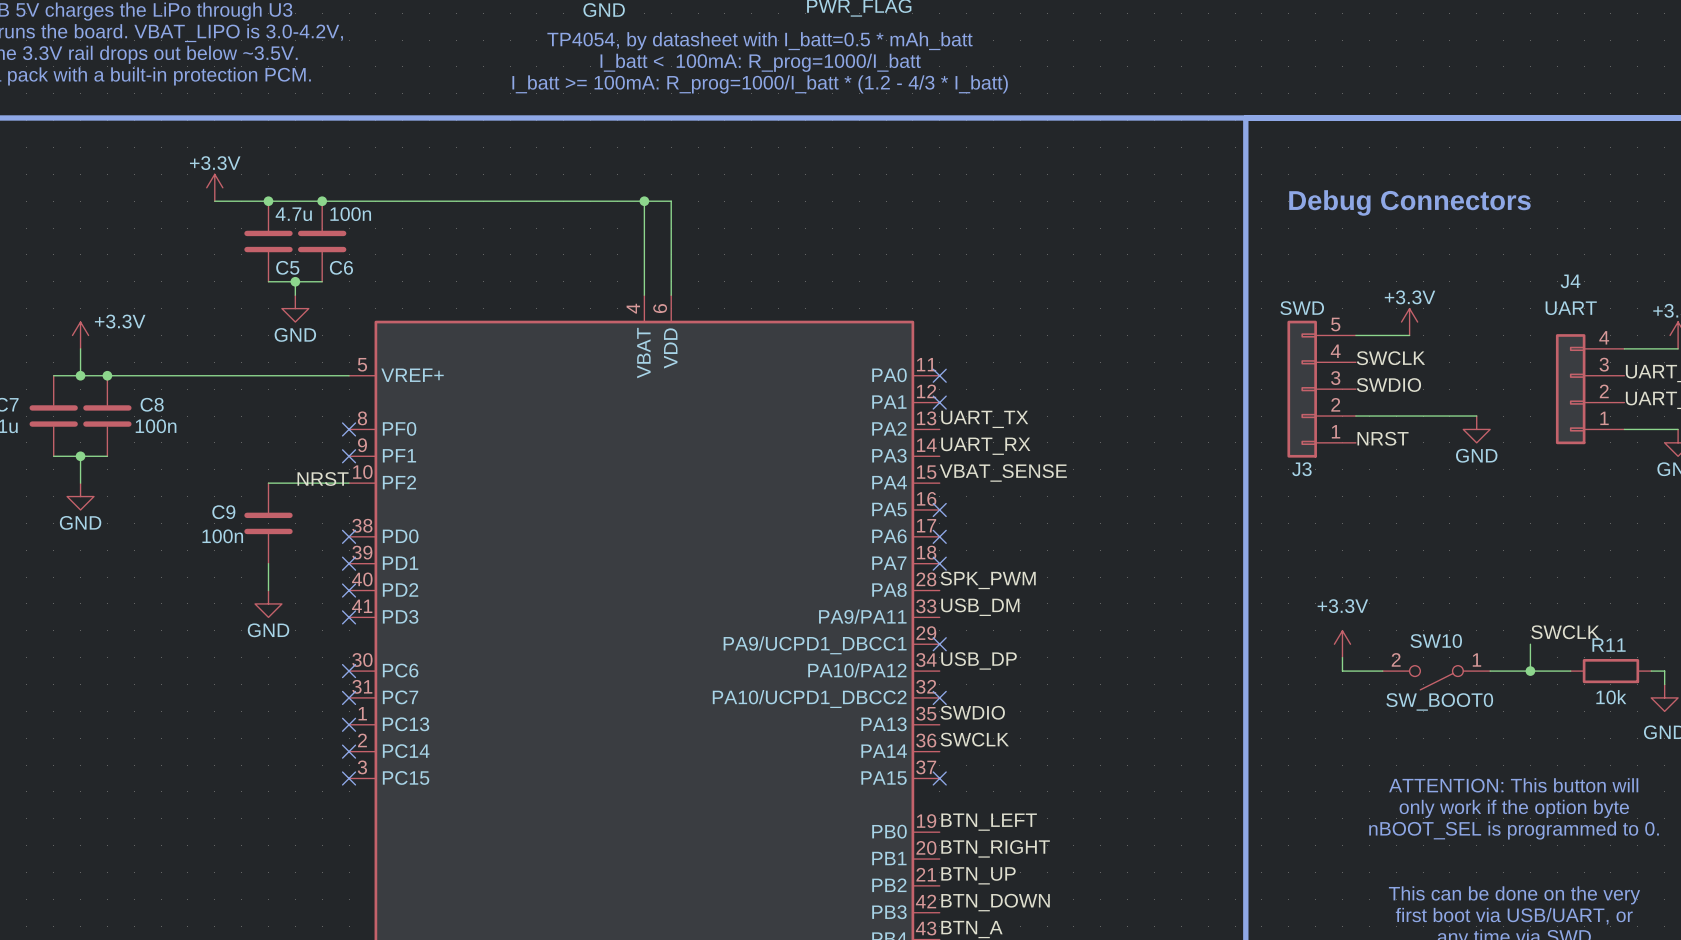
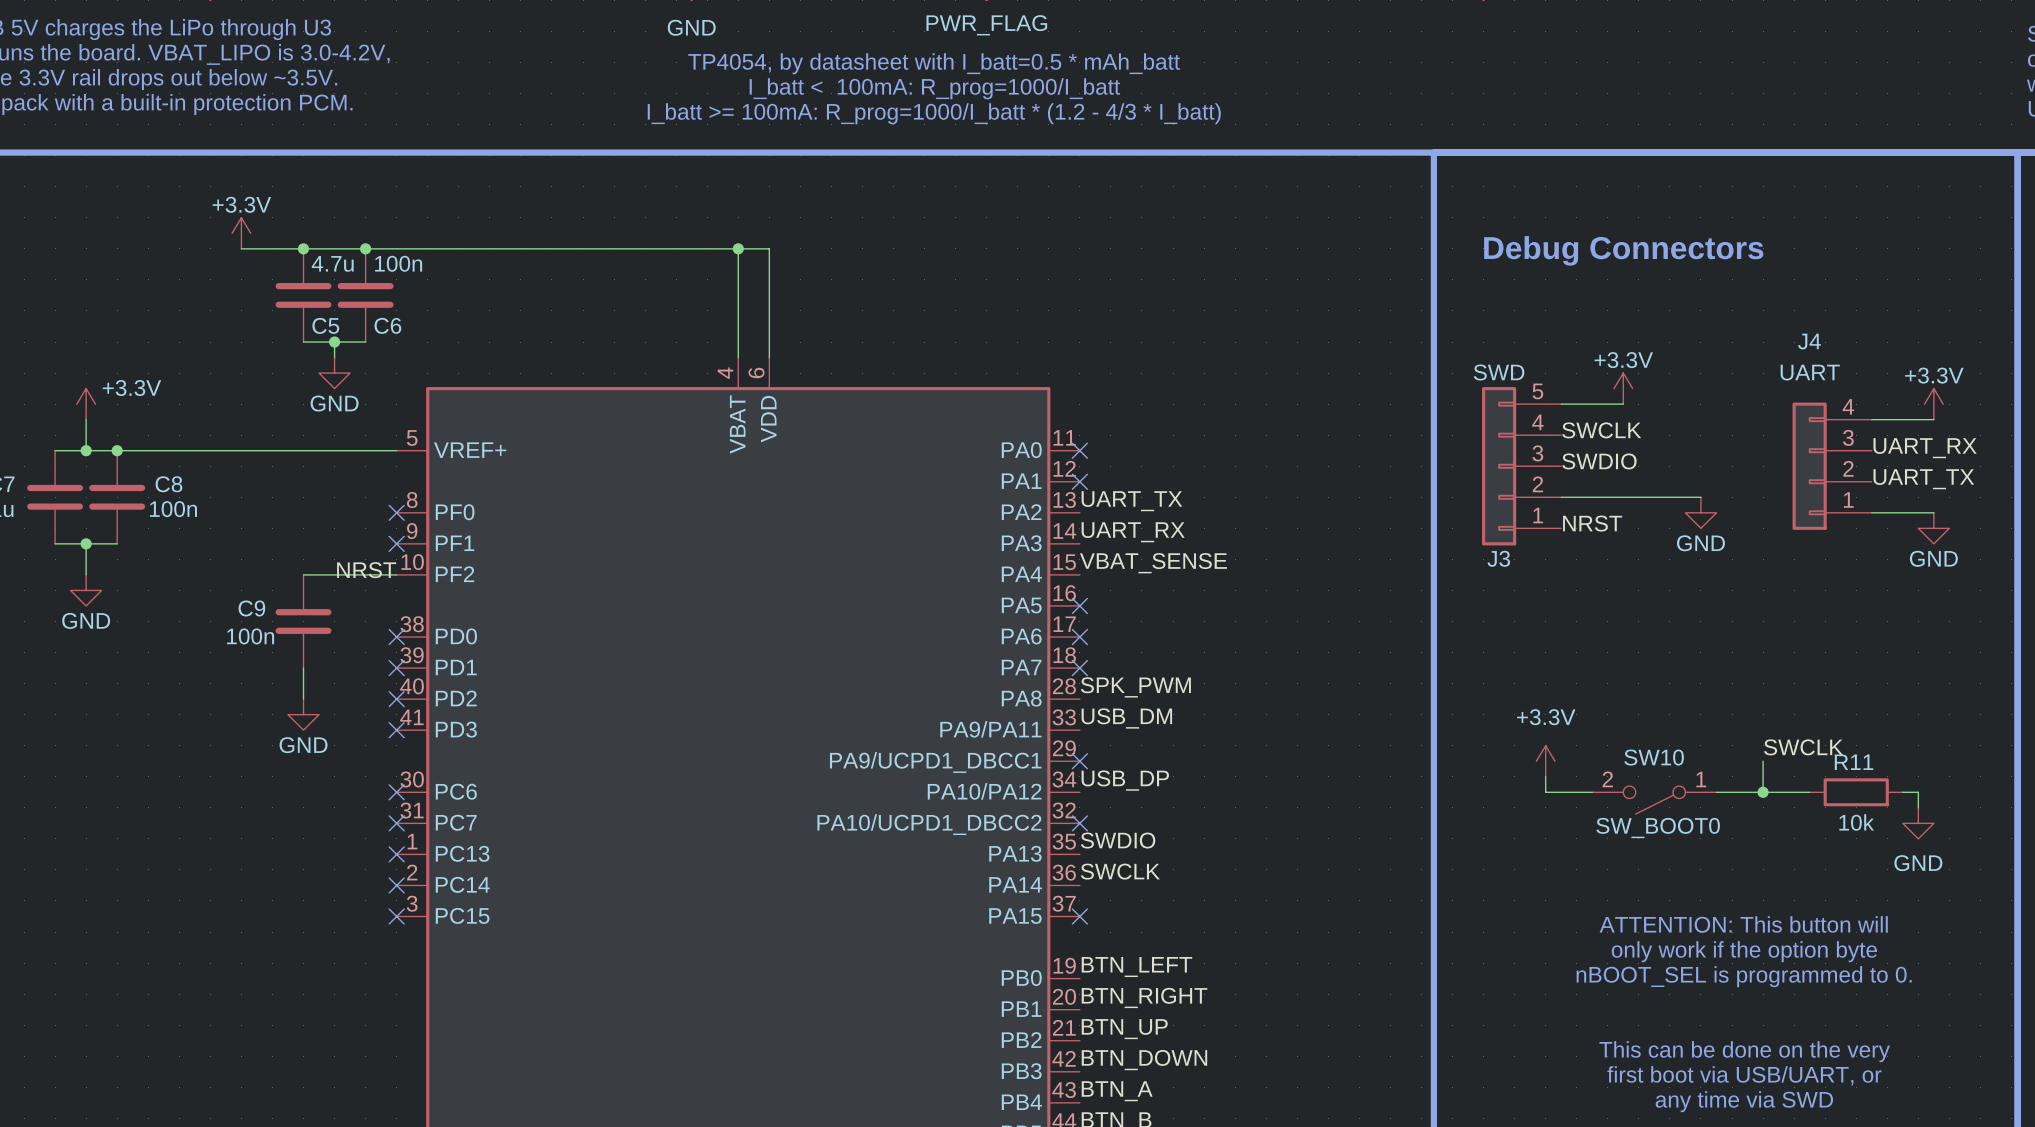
text position: TP4054, by datasheet with I_batt=0.5 * mAh_batt (759, 41) -> TP4054, by datasheet with I_batt=0.5 * mAh_batt (934, 63)
text position: I_batt < 100mA: R_prog=1000/I_batt (760, 62) -> I_batt < 100mA: R_prog=1000/I_batt (934, 88)
text position: I_batt >= 100mA: R_prog=1000/I_batt * (1.2 - 4/3 * I_batt) (760, 84) -> I_batt >= 100mA: R_prog=1000/I_batt * (1.2 - 4/3 * I_batt) (934, 113)

